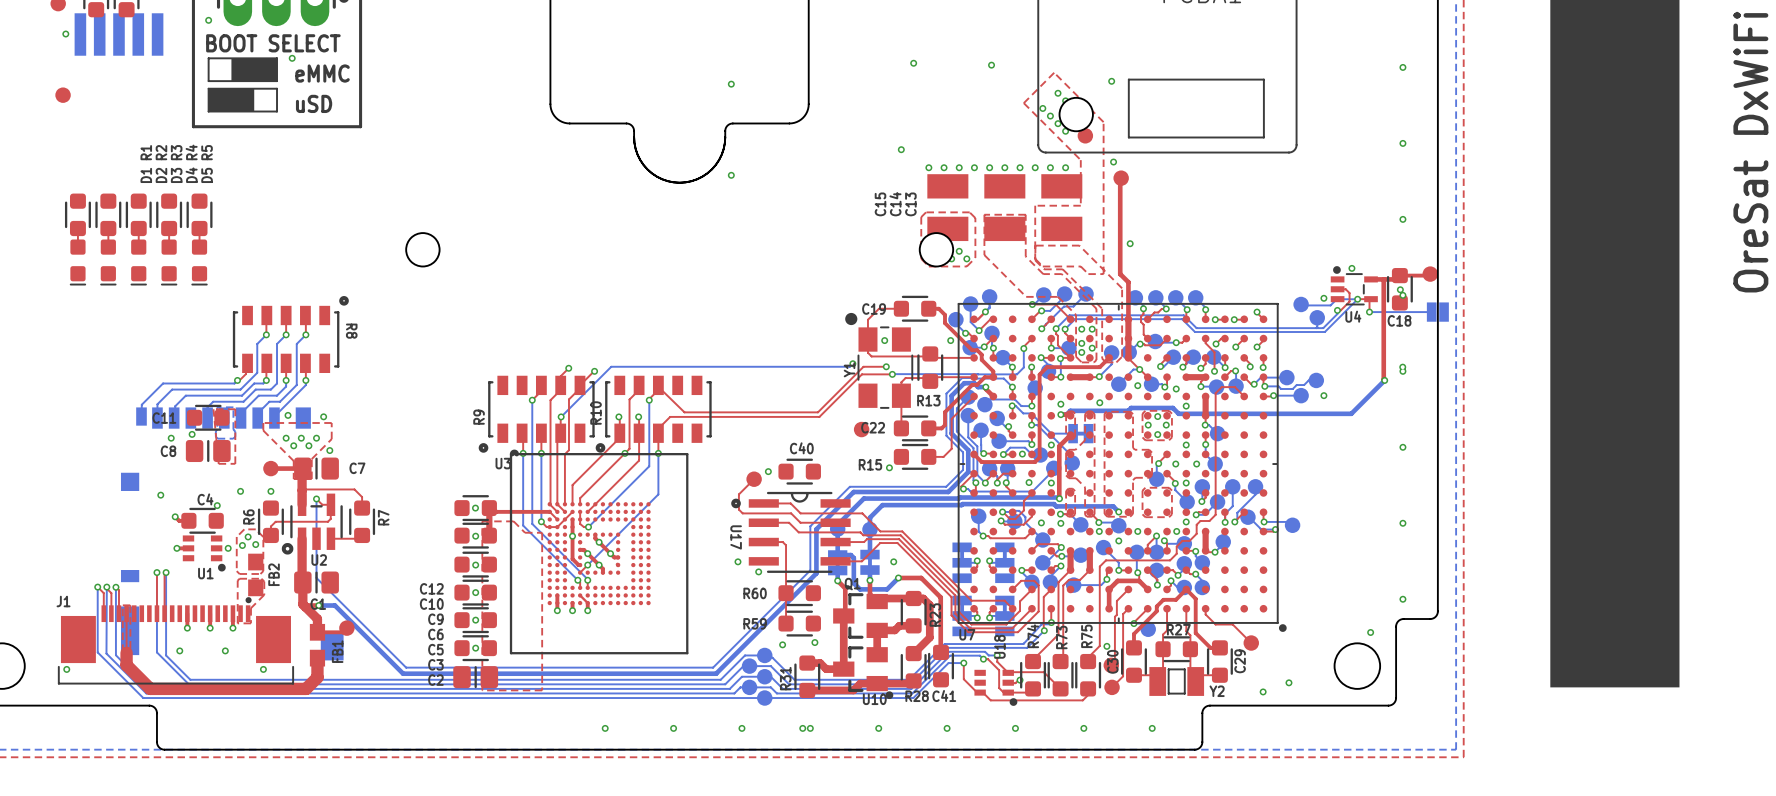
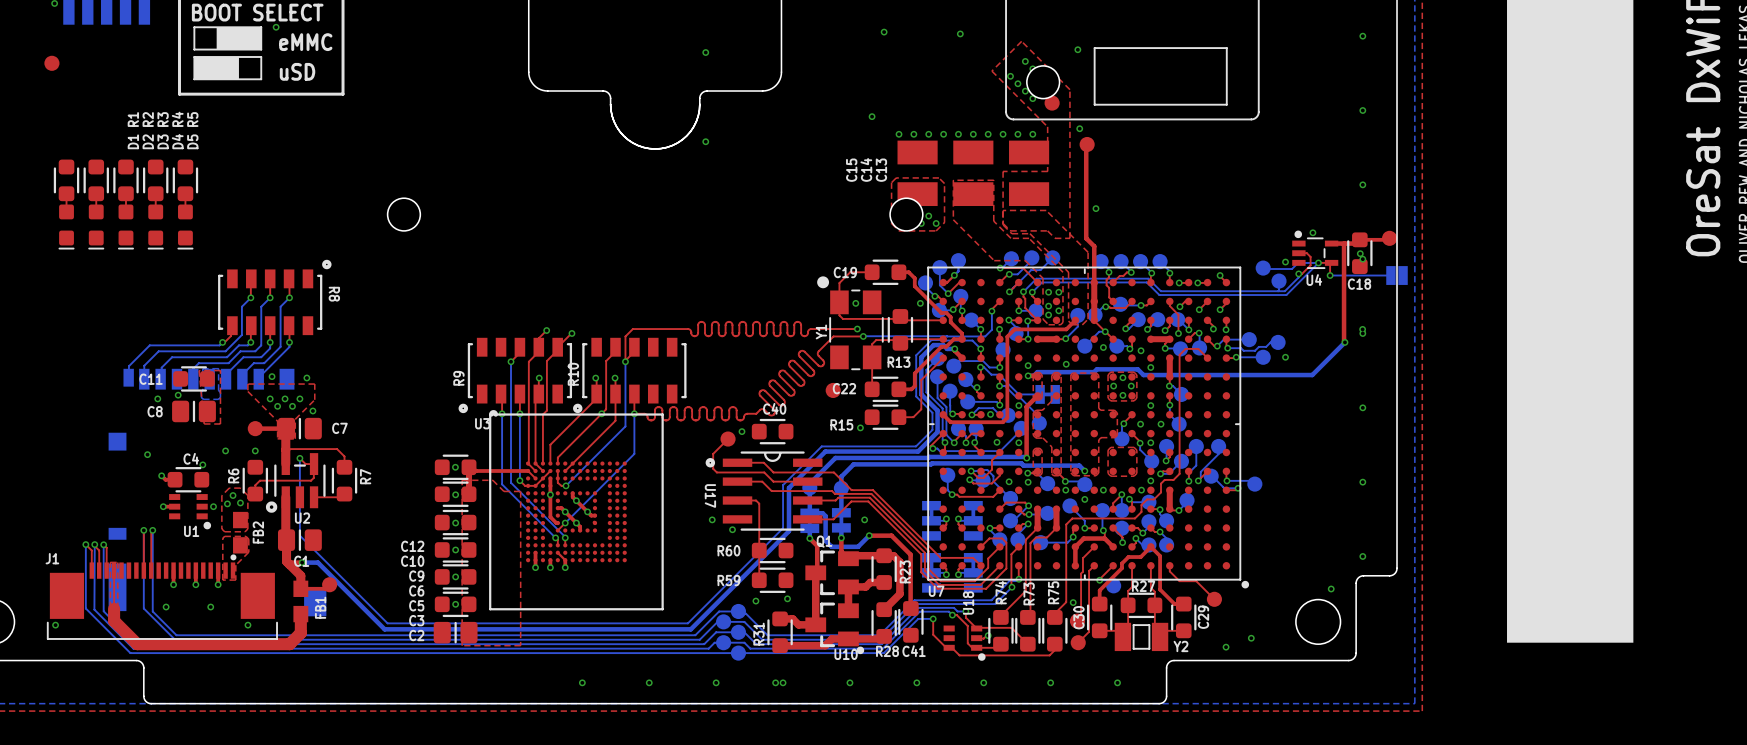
top track: none -> (701, 321) (698, 323) (698, 333) (694, 336)
top track: none -> (701, 321) (704, 323) (705, 333) (708, 336)
top track: none -> (715, 321) (712, 323) (711, 333) (708, 336)
top track: none -> (715, 321) (718, 324) (718, 334) (722, 336)
top track: none -> (728, 321) (725, 323) (725, 333) (722, 336)
top track: none -> (729, 321) (732, 323) (732, 333) (735, 336)
top track: none -> (742, 321) (739, 323) (739, 333) (736, 336)
top track: none -> (742, 321) (745, 323) (746, 333) (749, 336)
top track: none -> (756, 321) (753, 323) (752, 333) (749, 336)
top track: none -> (756, 321) (759, 323) (760, 333) (763, 336)
top track: none -> (770, 321) (767, 323) (766, 333) (763, 336)
top track: none -> (770, 321) (773, 323) (773, 333) (776, 336)
top track: none -> (783, 321) (780, 323) (780, 333) (777, 336)
top track: none -> (784, 321) (787, 323) (787, 333) (790, 336)
top track: none -> (797, 321) (794, 323) (794, 333) (790, 336)
top track: none -> (797, 321) (800, 323) (801, 333) (804, 336)
bottom track: (852, 363) (849, 366) (611, 366) (561, 416) -> none
via: (852, 363) -> none
top track: (863, 366) (817, 412) (684, 412) (658, 386) -> (835, 329) (810, 329) (804, 336)
top track: none -> (694, 336) (688, 329) (632, 329) (625, 336) (625, 360)
top track: (846, 389) (819, 416) (670, 416) (658, 428) -> (818, 351) (818, 354) (824, 362) (821, 366) (803, 351) (798, 353) (813, 371) (812, 375) (808, 375) (794, 361) (789, 362) (789, 366) (804, 380) (802, 385) (798, 385) (784, 370) (779, 372) (779, 375) (794, 390) (792, 395) (789, 395) (774, 380) (769, 382) (769, 385) (784, 400) (783, 405) (779, 405) (764, 390) (760, 391) (760, 395) (774, 410) (772, 415) (761, 409) (756, 413) (746, 414) (743, 419) (739, 420) (736, 417) (736, 409) (733, 407) (729, 408) (729, 417) (726, 420) (722, 418) (721, 409) (718, 407) (714, 408) (714, 417) (711, 420) (707, 418) (706, 409) (704, 407) (699, 408) (699, 417) (696, 420) (692, 418) (691, 409) (689, 407) (685, 408) (684, 417) (681, 420) (677, 418) (677, 409) (674, 407) (670, 408) (669, 417) (666, 420) (662, 418) (662, 409) (659, 407) (655, 408) (654, 417) (652, 420) (648, 419) (645, 414) (634, 413)

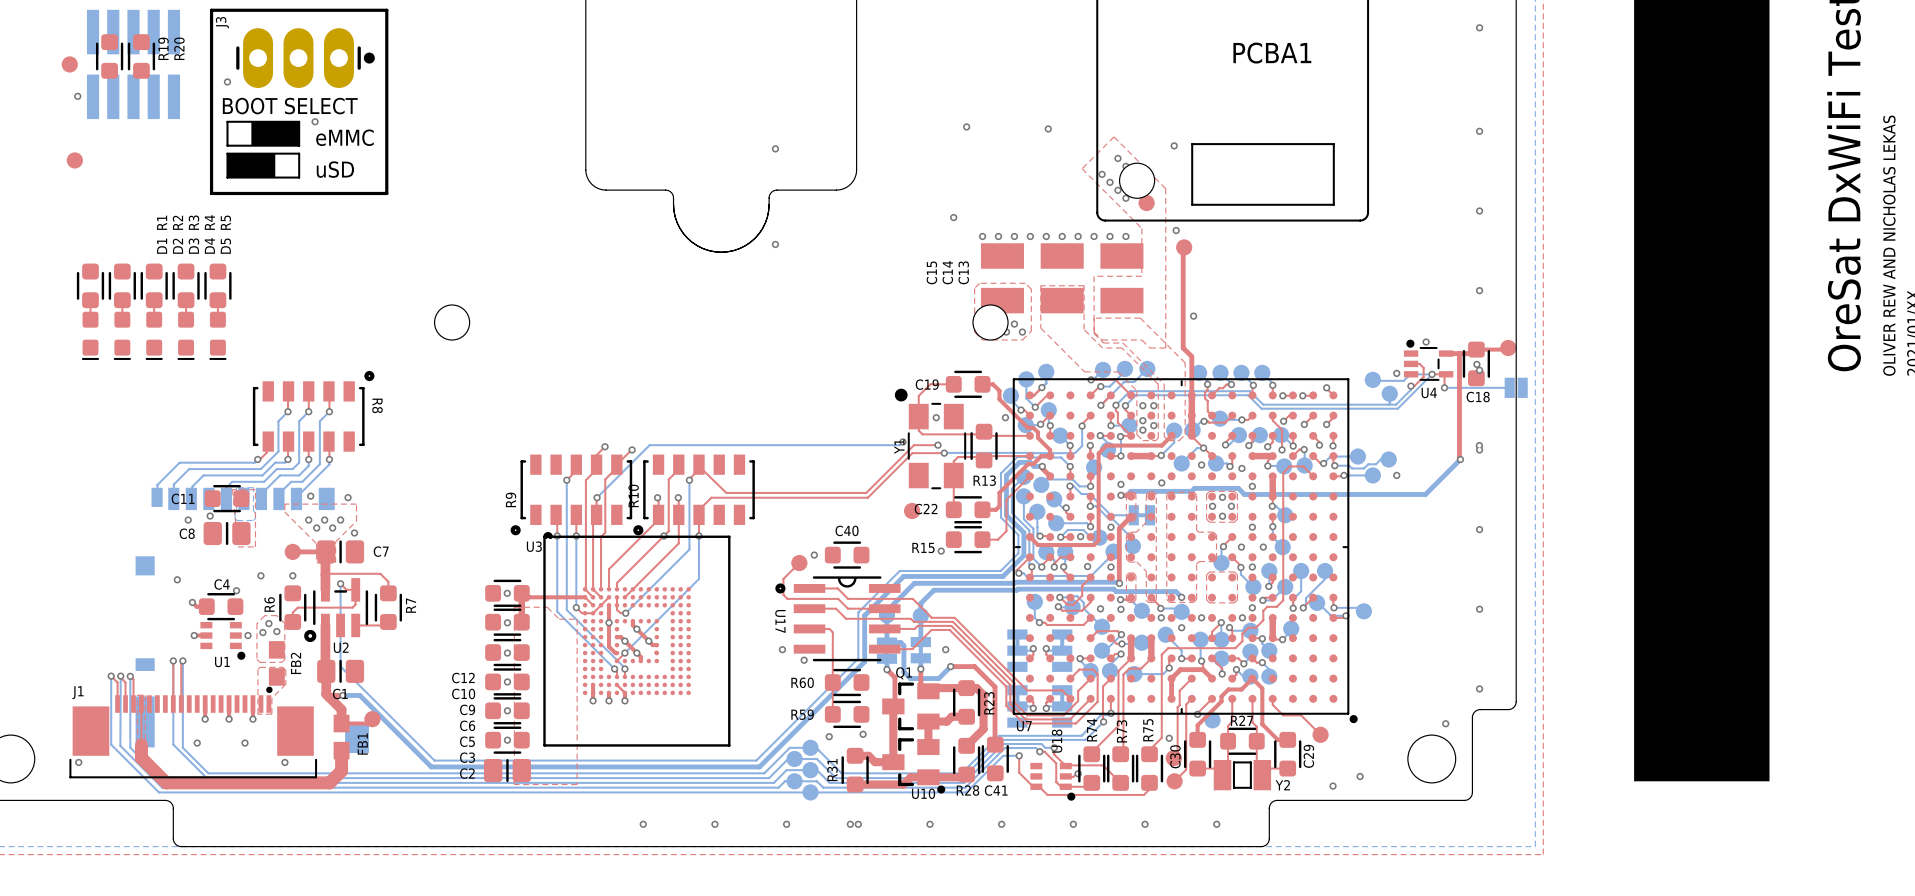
top track: (701, 321) (698, 323) (698, 333) (694, 336) -> none
top track: (701, 321) (704, 323) (705, 333) (708, 336) -> none
top track: (715, 321) (712, 323) (711, 333) (708, 336) -> none
top track: (715, 321) (718, 324) (718, 334) (722, 336) -> none
top track: (728, 321) (725, 323) (725, 333) (722, 336) -> none
top track: (729, 321) (732, 323) (732, 333) (735, 336) -> none
top track: (742, 321) (739, 323) (739, 333) (736, 336) -> none
top track: (742, 321) (745, 323) (746, 333) (749, 336) -> none
top track: (756, 321) (753, 323) (752, 333) (749, 336) -> none
top track: (756, 321) (759, 323) (760, 333) (763, 336) -> none
top track: (770, 321) (767, 323) (766, 333) (763, 336) -> none
top track: (770, 321) (773, 323) (773, 333) (776, 336) -> none
top track: (783, 321) (780, 323) (780, 333) (777, 336) -> none
top track: (784, 321) (787, 323) (787, 333) (790, 336) -> none
top track: (797, 321) (794, 323) (794, 333) (790, 336) -> none
top track: (797, 321) (800, 323) (801, 333) (804, 336) -> none
bottom track: none -> (902, 441) (899, 445) (649, 445) (597, 497)
via: none -> (902, 441)
top track: (835, 329) (810, 329) (804, 336) -> (914, 445) (866, 492) (726, 492) (699, 466)
top track: (694, 336) (688, 329) (632, 329) (625, 336) (625, 360) -> none
top track: (818, 351) (818, 354) (824, 362) (821, 366) (803, 351) (798, 353) (813, 371) (812, 375) (808, 375) (794, 361) (789, 362) (789, 366) (804, 380) (802, 385) (798, 385) (784, 370) (779, 372) (779, 375) (794, 390) (792, 395) (789, 395) (774, 380) (769, 382) (769, 385) (784, 400) (783, 405) (779, 405) (764, 390) (760, 391) (760, 395) (774, 410) (772, 415) (761, 409) (756, 413) (746, 414) (743, 419) (739, 420) (736, 417) (736, 409) (733, 407) (729, 408) (729, 417) (726, 420) (722, 418) (721, 409) (718, 407) (714, 408) (714, 417) (711, 420) (707, 418) (706, 409) (704, 407) (699, 408) (699, 417) (696, 420) (692, 418) (691, 409) (689, 407) (685, 408) (684, 417) (681, 420) (677, 418) (677, 409) (674, 407) (670, 408) (669, 417) (666, 420) (662, 418) (662, 409) (659, 407) (655, 408) (654, 417) (652, 420) (648, 419) (645, 414) (634, 413) -> (896, 469) (867, 497) (711, 497) (699, 510)

